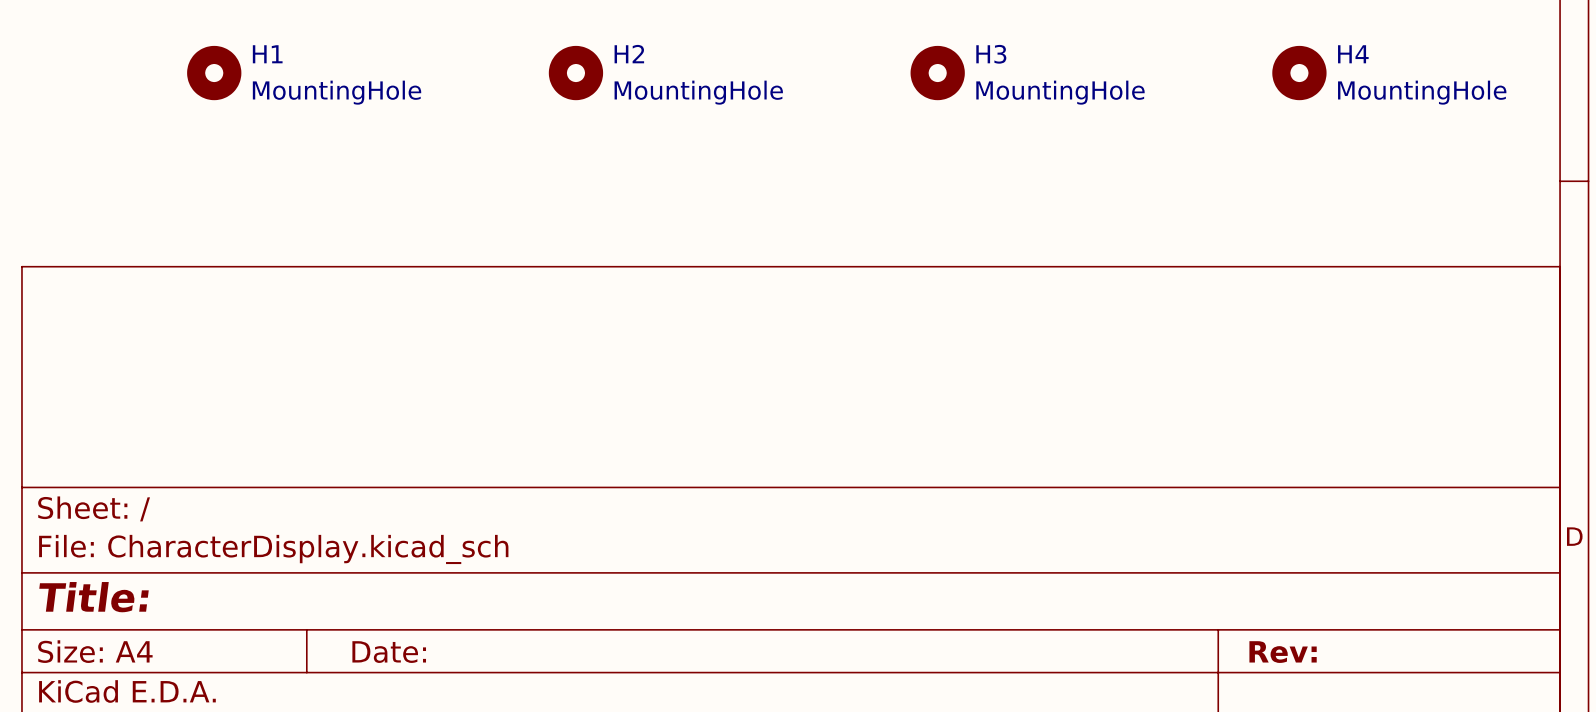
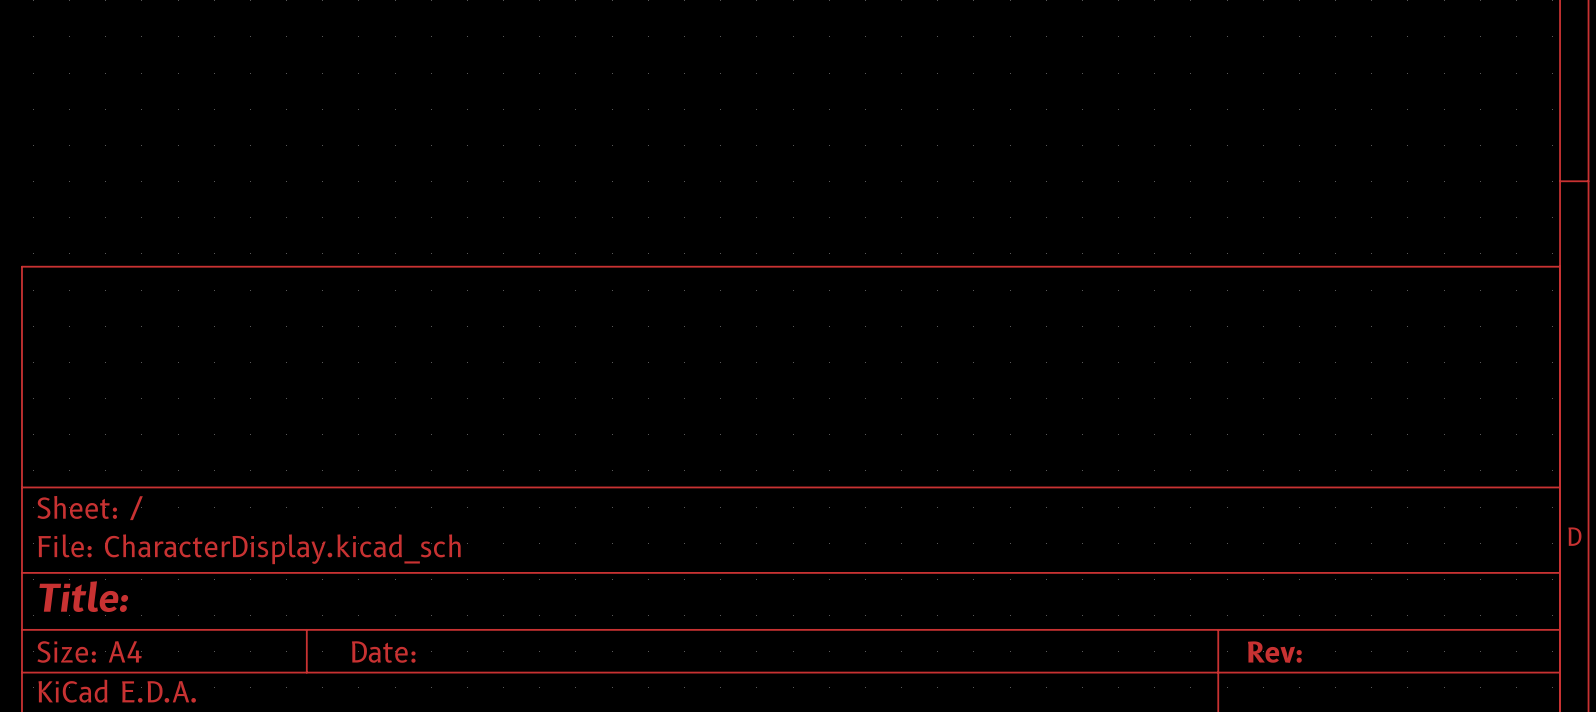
H1: MountingHole (214, 73) -> none
H2: MountingHole (575, 73) -> none
H3: MountingHole (937, 73) -> none
H4: MountingHole (1299, 73) -> none

